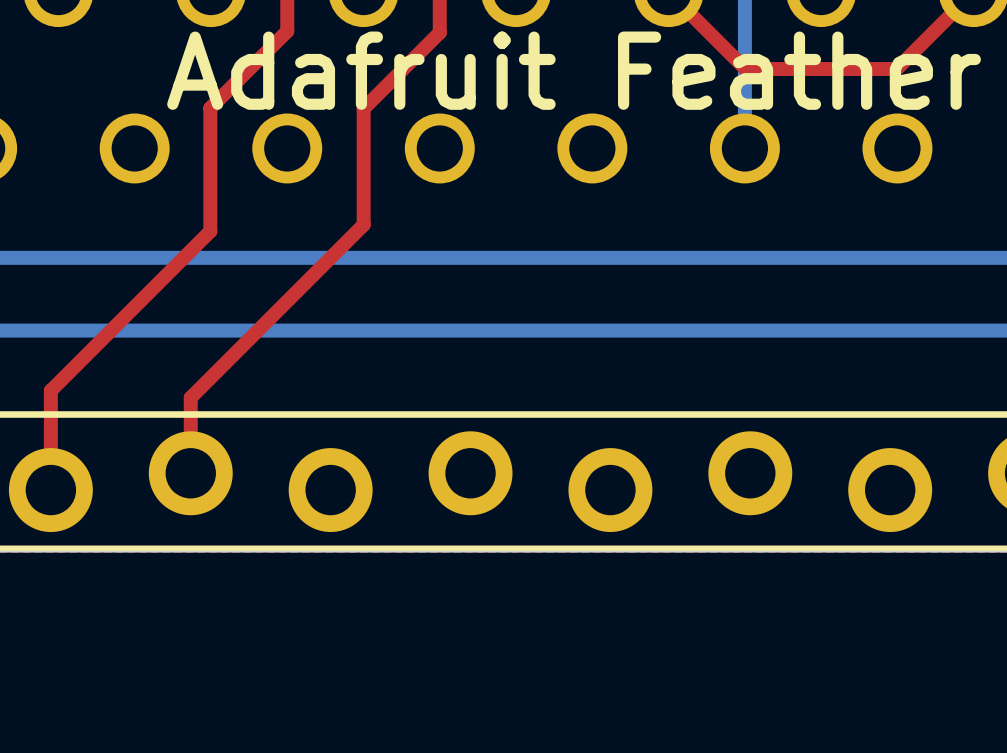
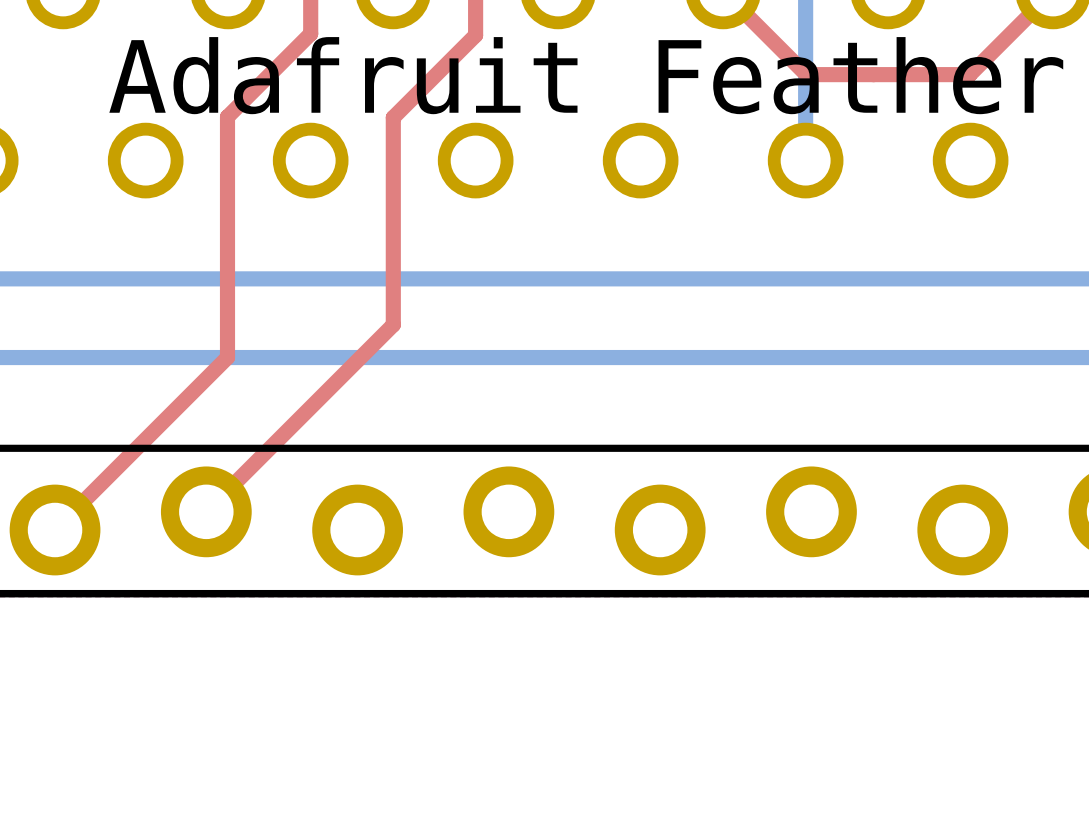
top track: (363, 224) (190, 397) (190, 473) -> (393, 243) (393, 324) (206, 511)
top track: (210, 231) (50, 390) (50, 490) -> (227, 250) (227, 357) (55, 530)

